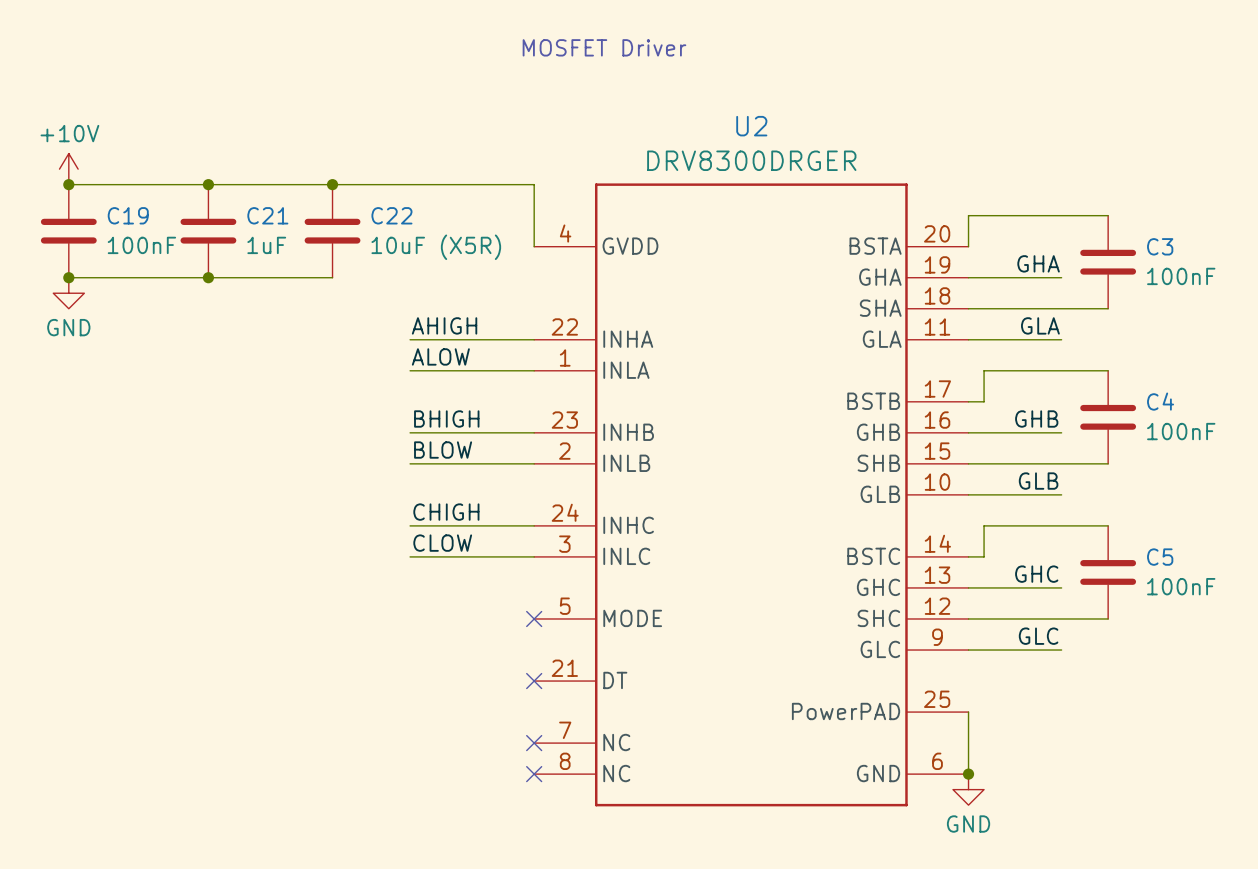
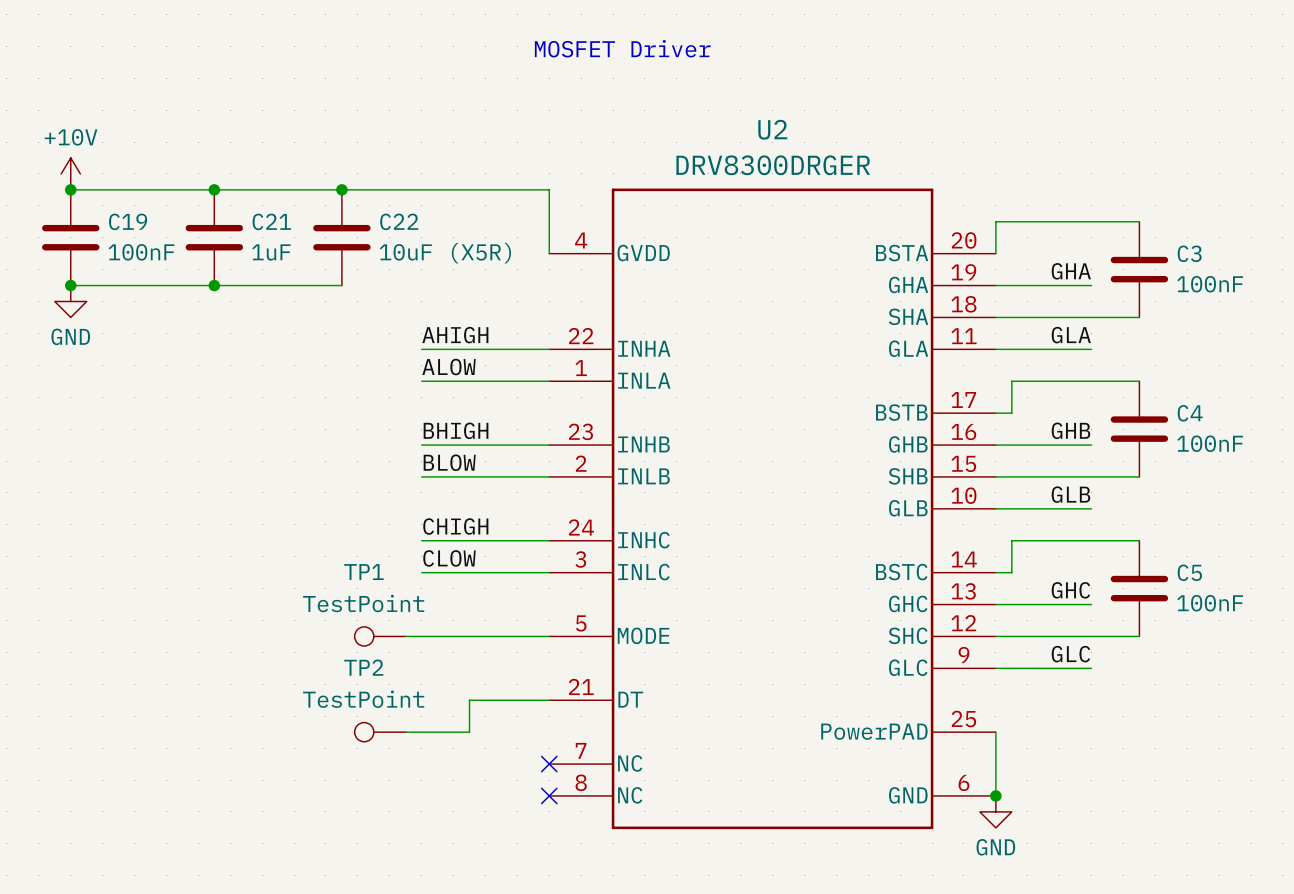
TP1: none -> TestPoint (380, 636)
wire: none -> (405, 636) (549, 636)
no-connect mark: (534, 618) -> none
wire: none -> (549, 700) (469, 700) (469, 732) (405, 732)
no-connect mark: (534, 681) -> none
TP2: none -> TestPoint (380, 732)

